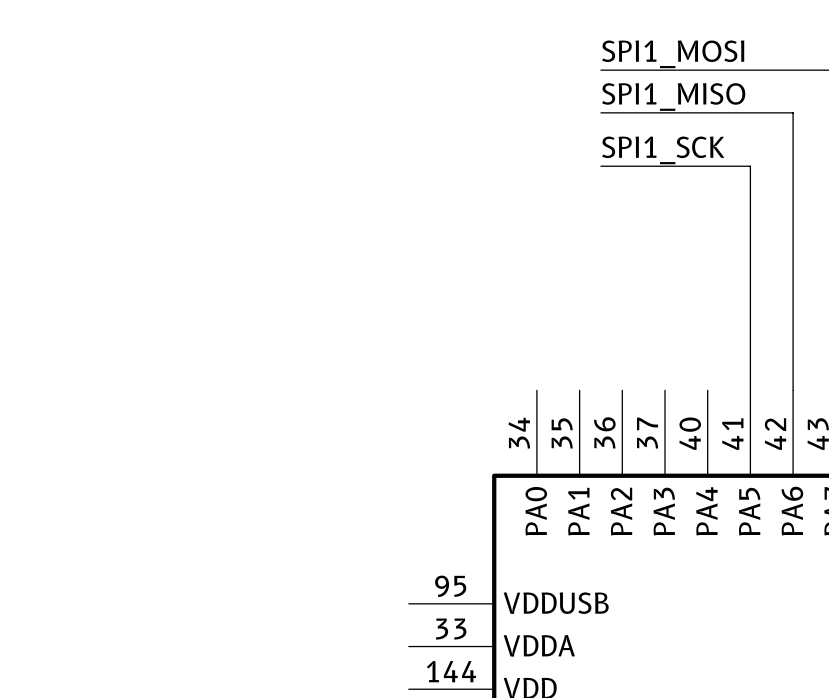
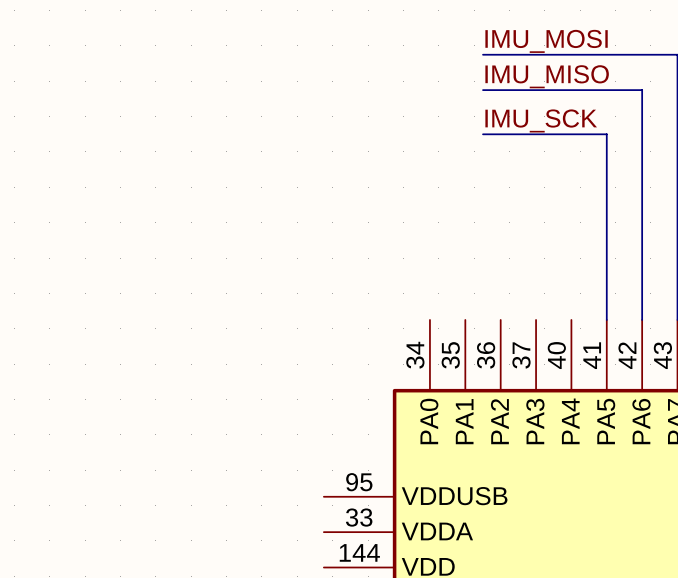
label: SPI1_MOSI (673, 54) -> IMU_MOSI (546, 41)
label: SPI1_MISO (673, 97) -> IMU_MISO (547, 76)
label: SPI1_SCK (663, 150) -> IMU_SCK (541, 120)

